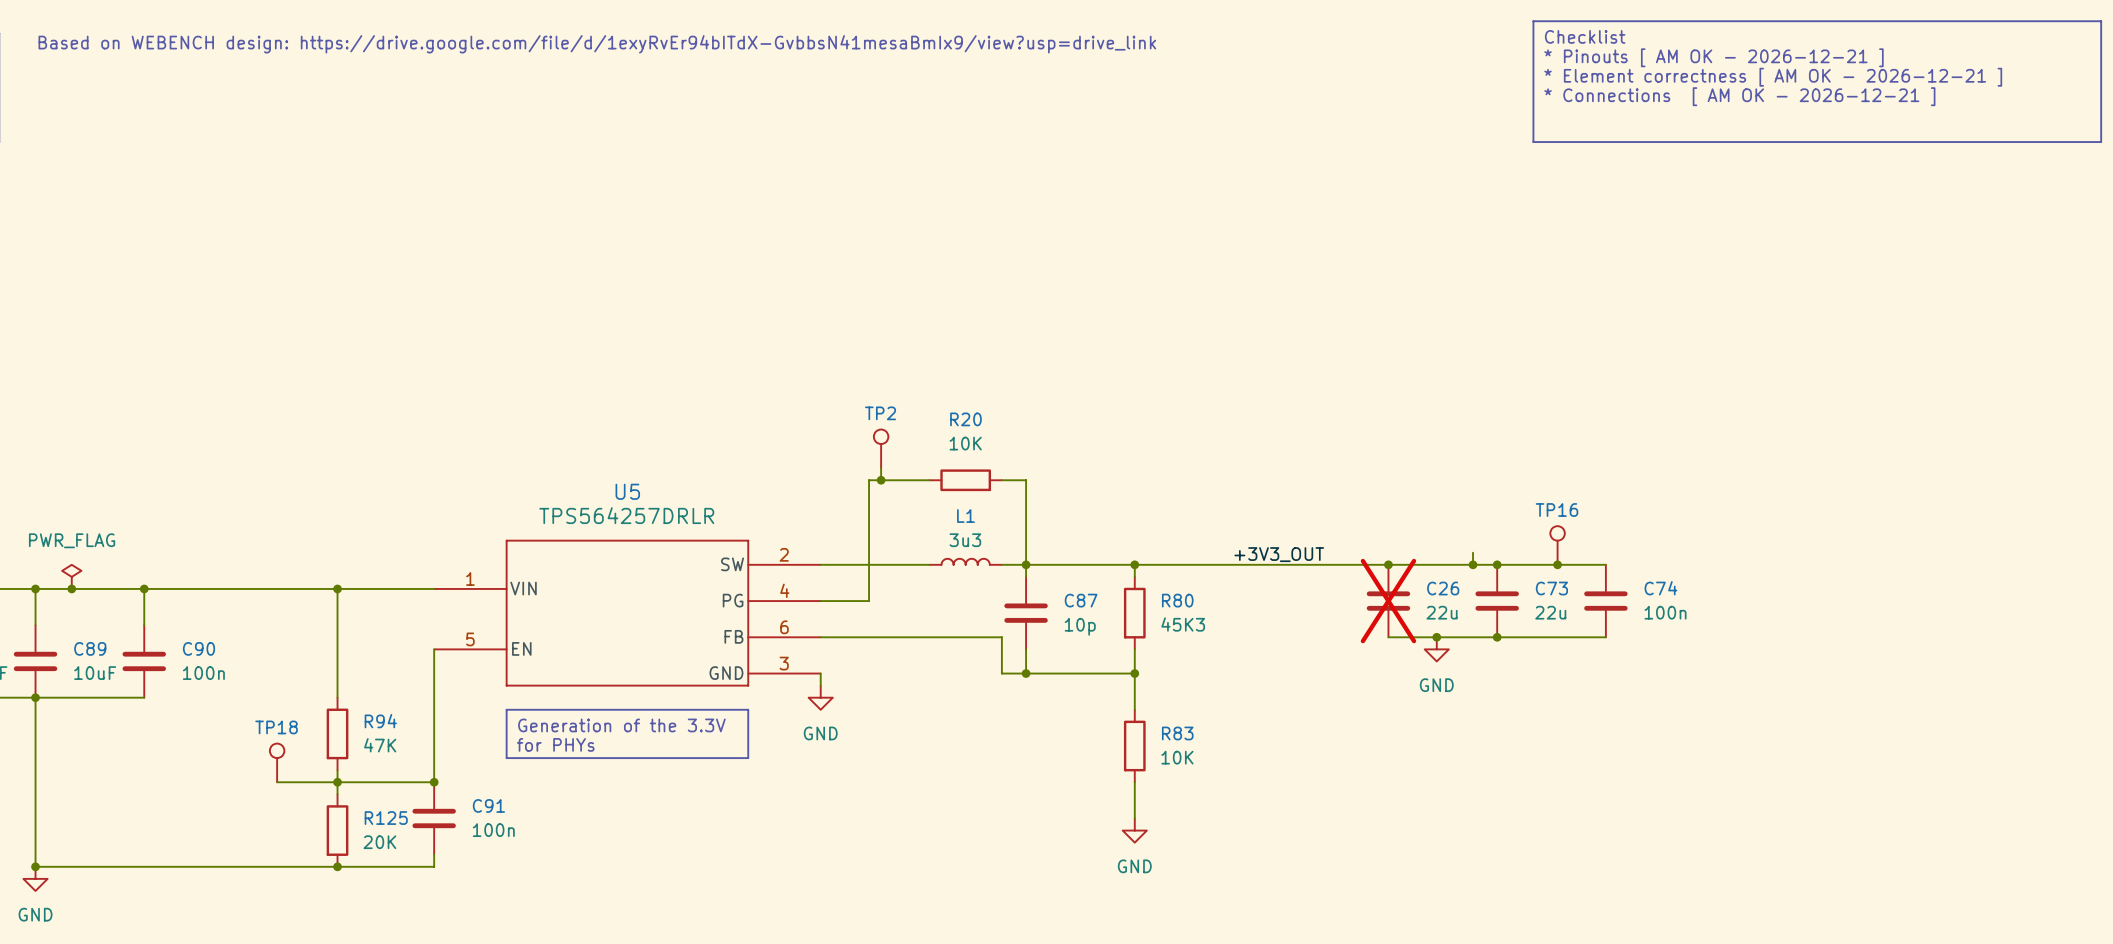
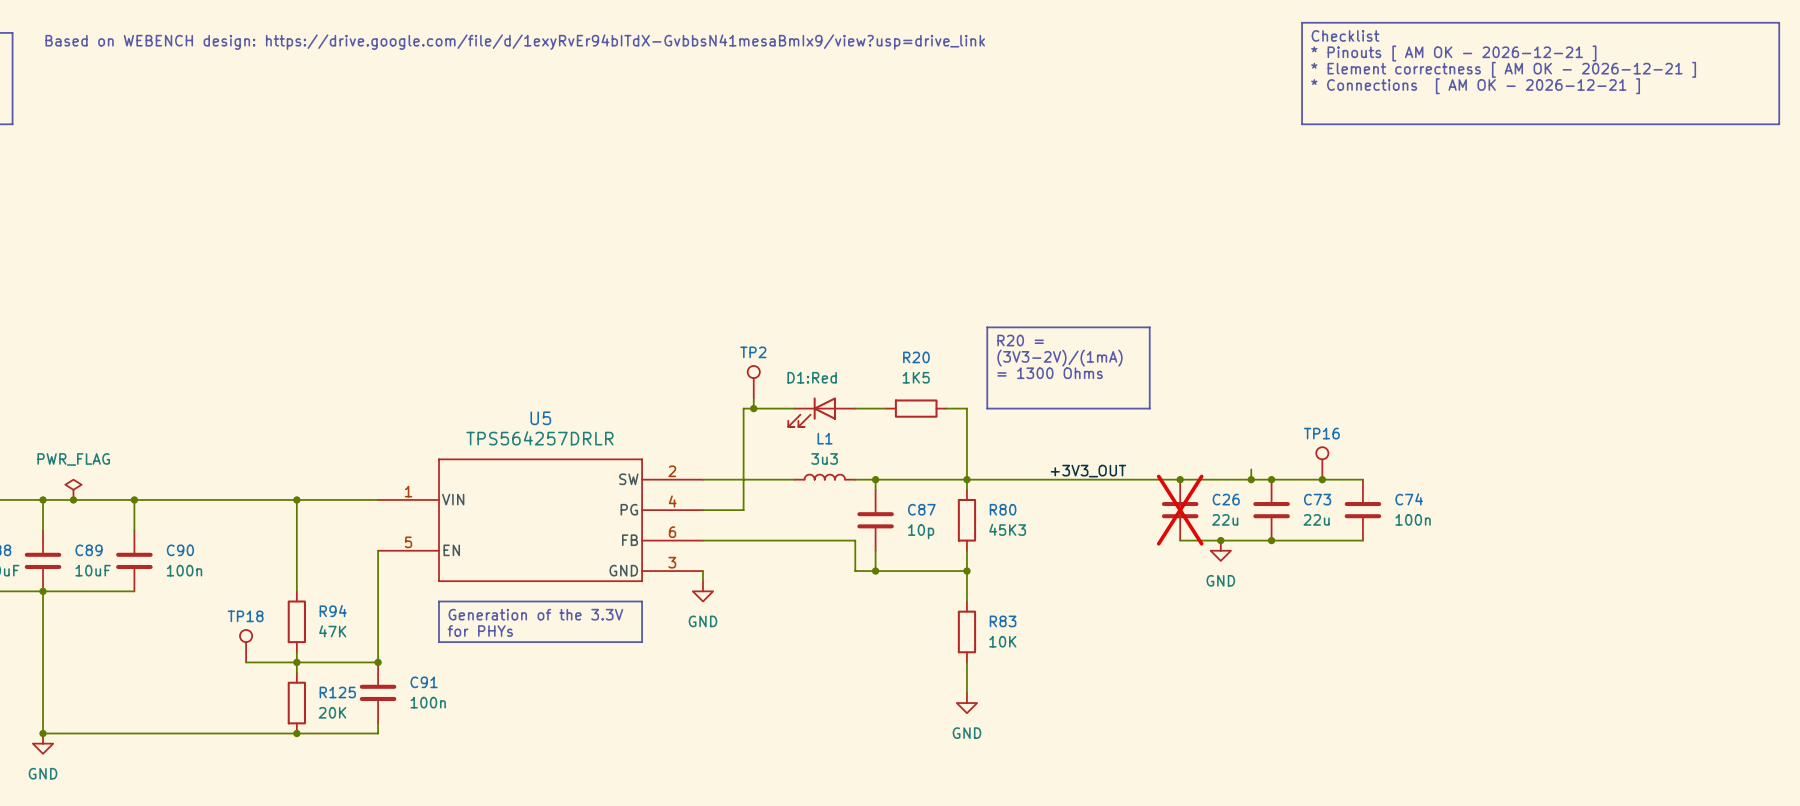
line: none -> (987, 327) (1149, 327) (1149, 408) (987, 408) (987, 327)
text: none -> R20 = (1020, 340)
text: none -> (3V3-2V)/(1mA) (1060, 358)
text: none -> = 1300 Ohms (1050, 373)
R20 value: 10K (965, 443) -> 1K5 (916, 377)
R20 position: (965, 480) -> (916, 408)
wire: (1026, 480) (1026, 564) -> (875, 408) (885, 408)
wire: none -> (946, 408) (966, 408) (966, 479)
part: none -> (821, 412)

